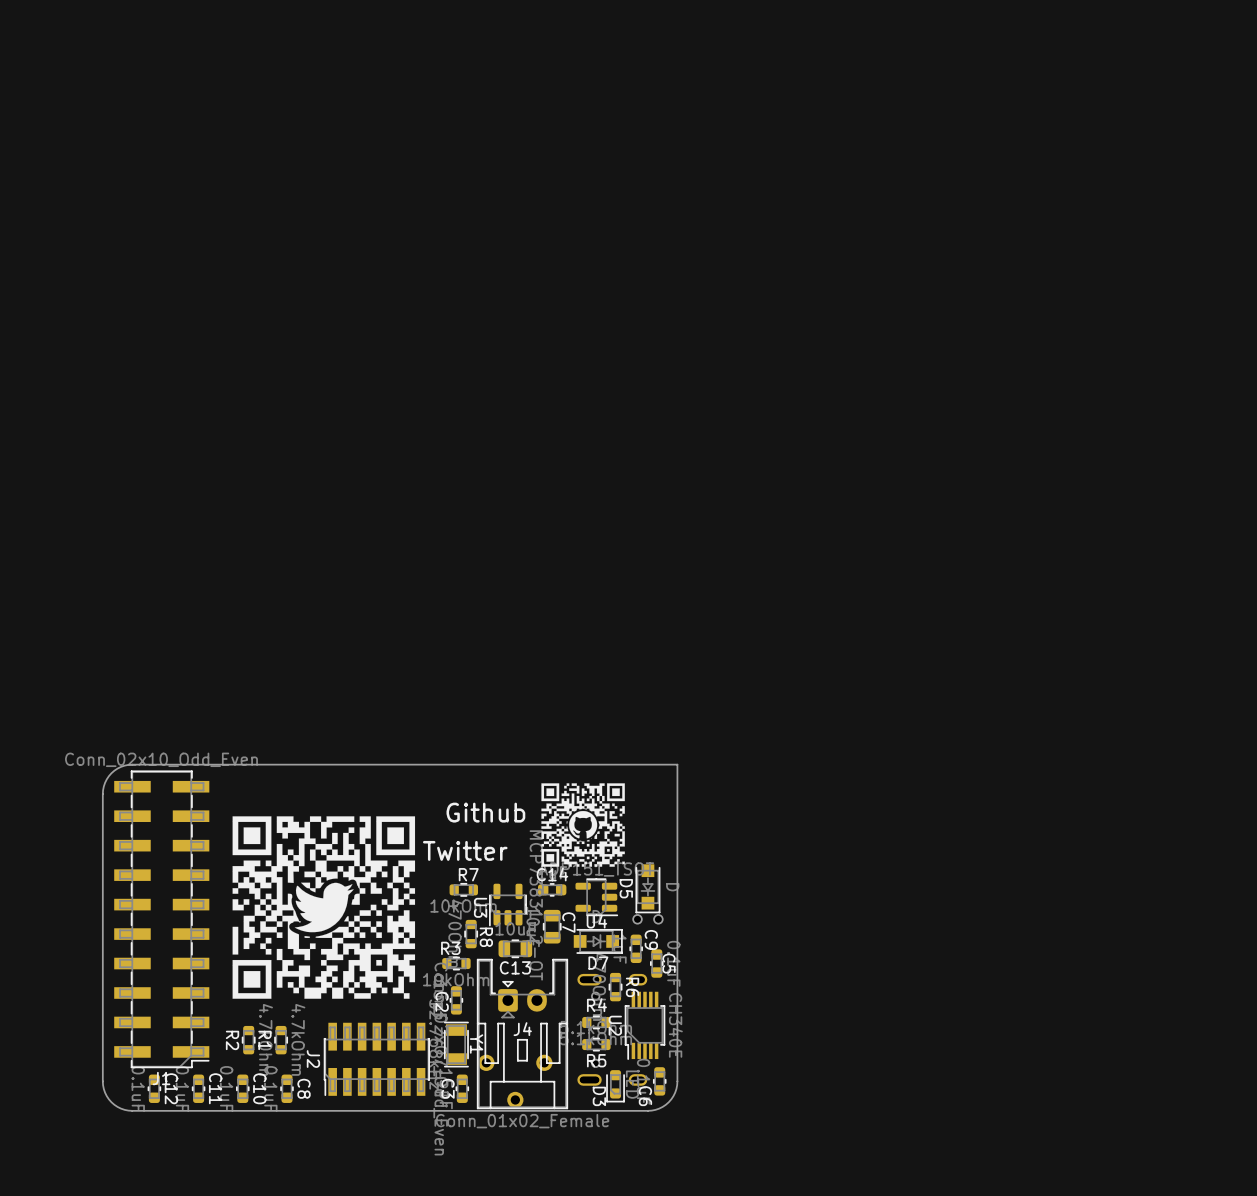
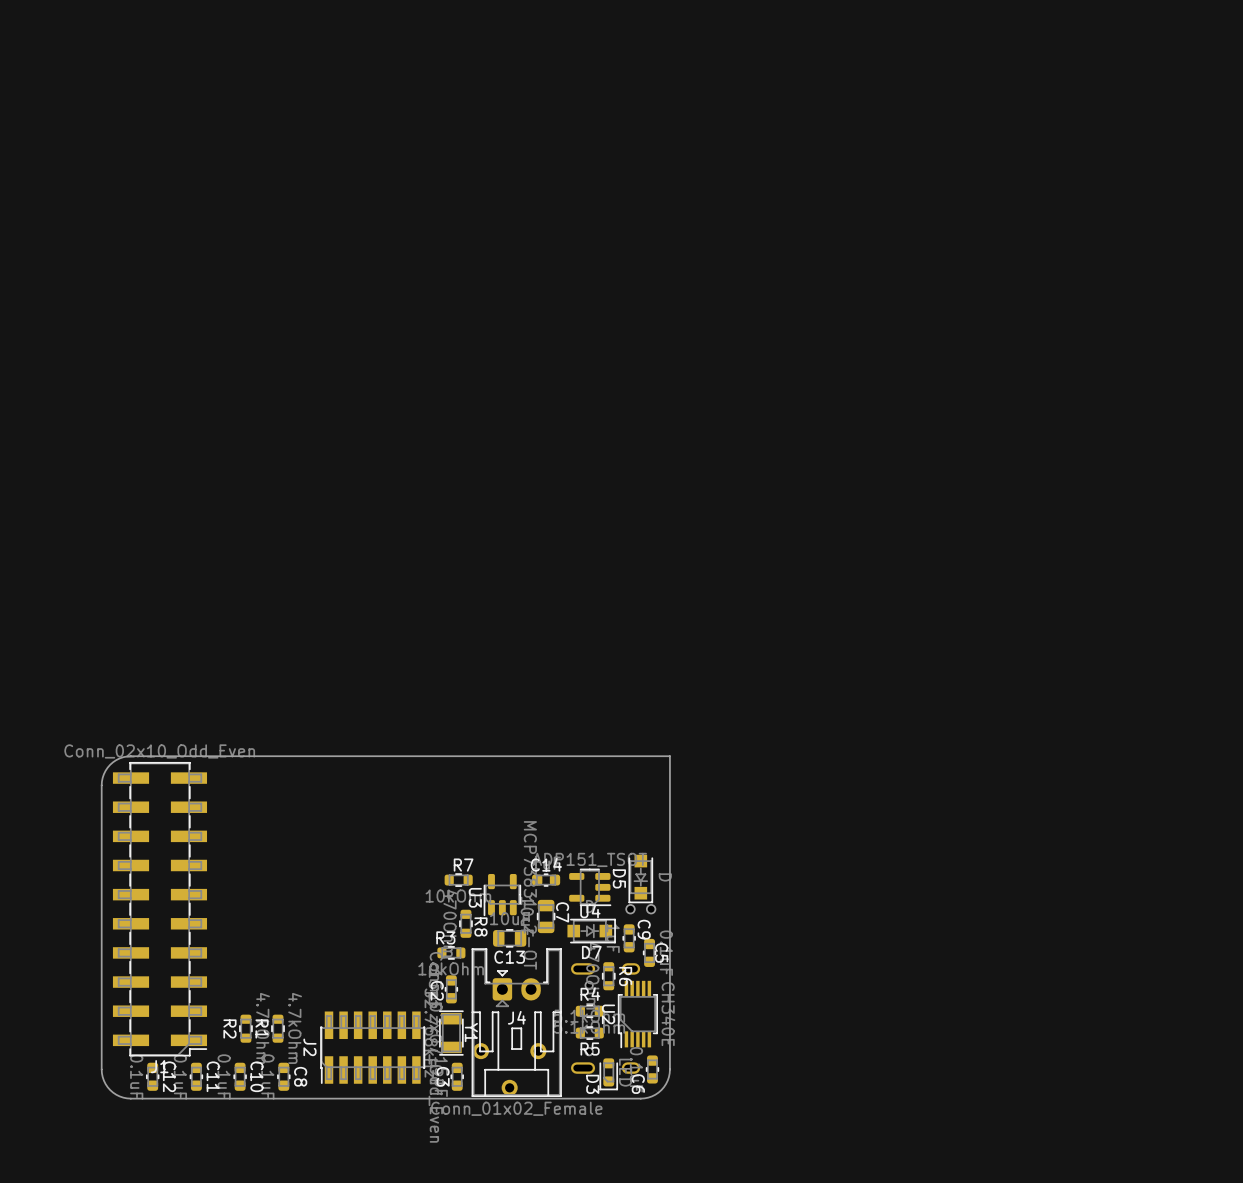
drawing: [541, 783, 625, 867] -> none
text: Github (485, 812) -> none
drawing: [232, 816, 416, 999] -> none
text: Twitter (465, 850) -> none

